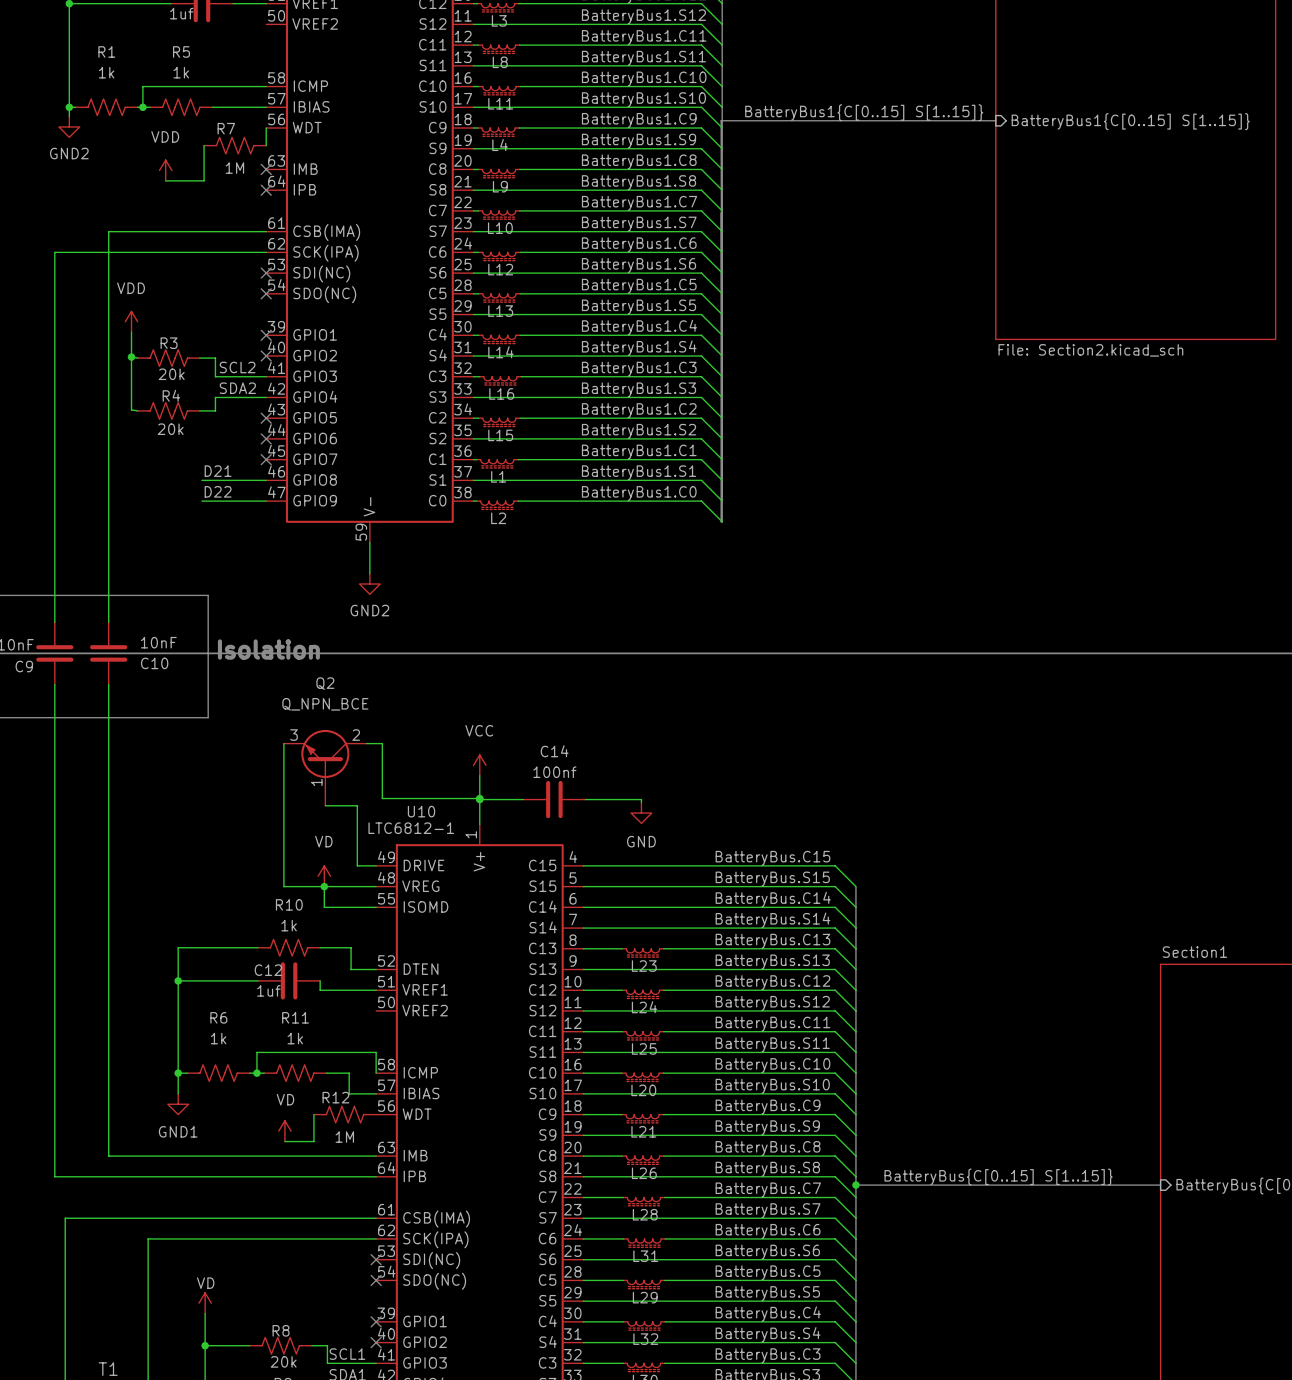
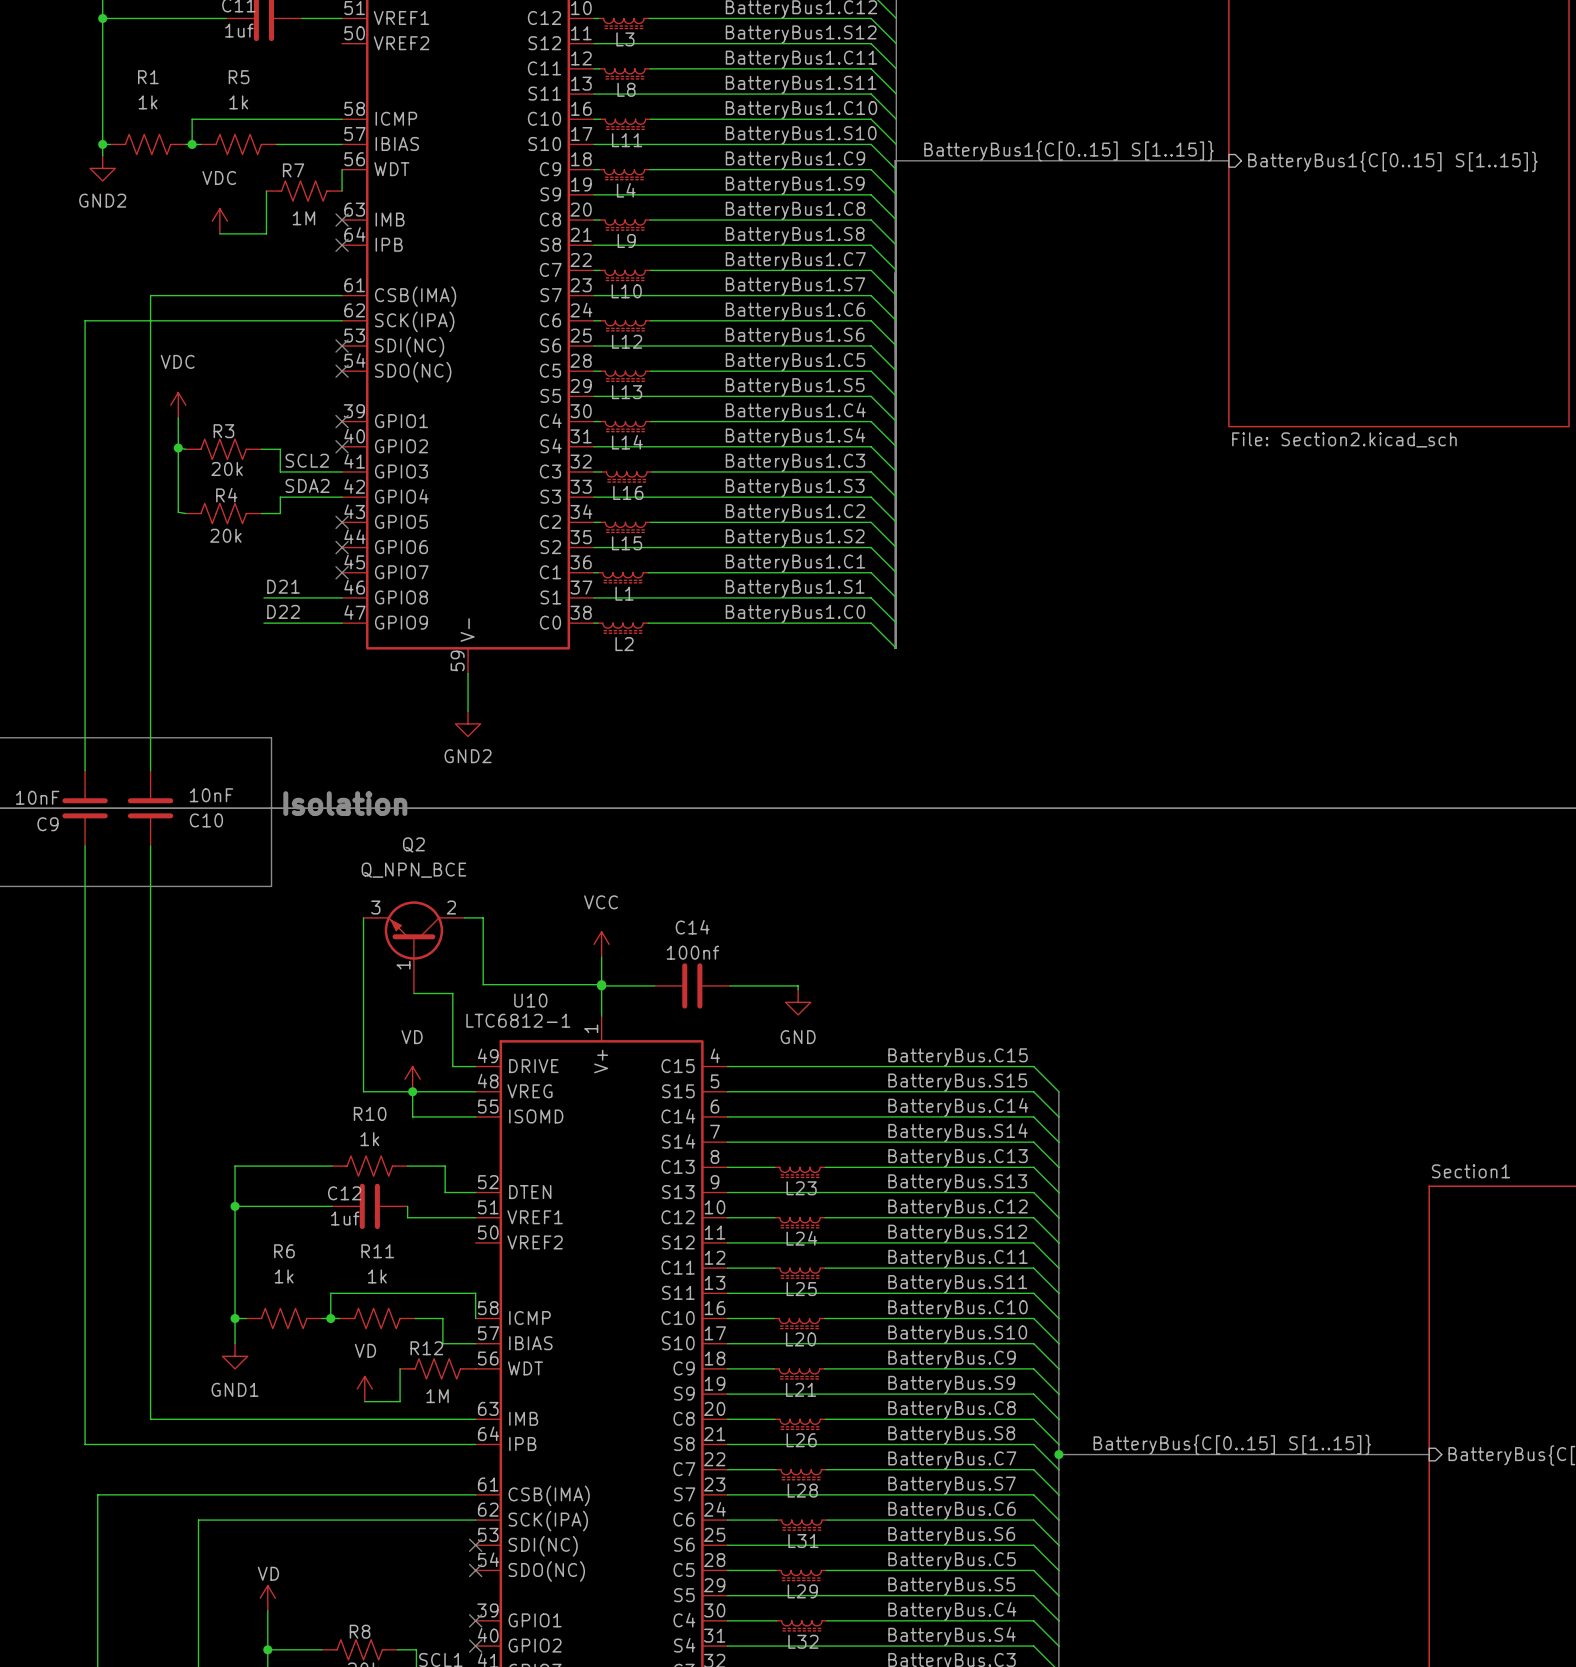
power symbol: VDD (165, 170) -> VDC (219, 221)
power symbol: VDD (131, 321) -> VDC (178, 405)

